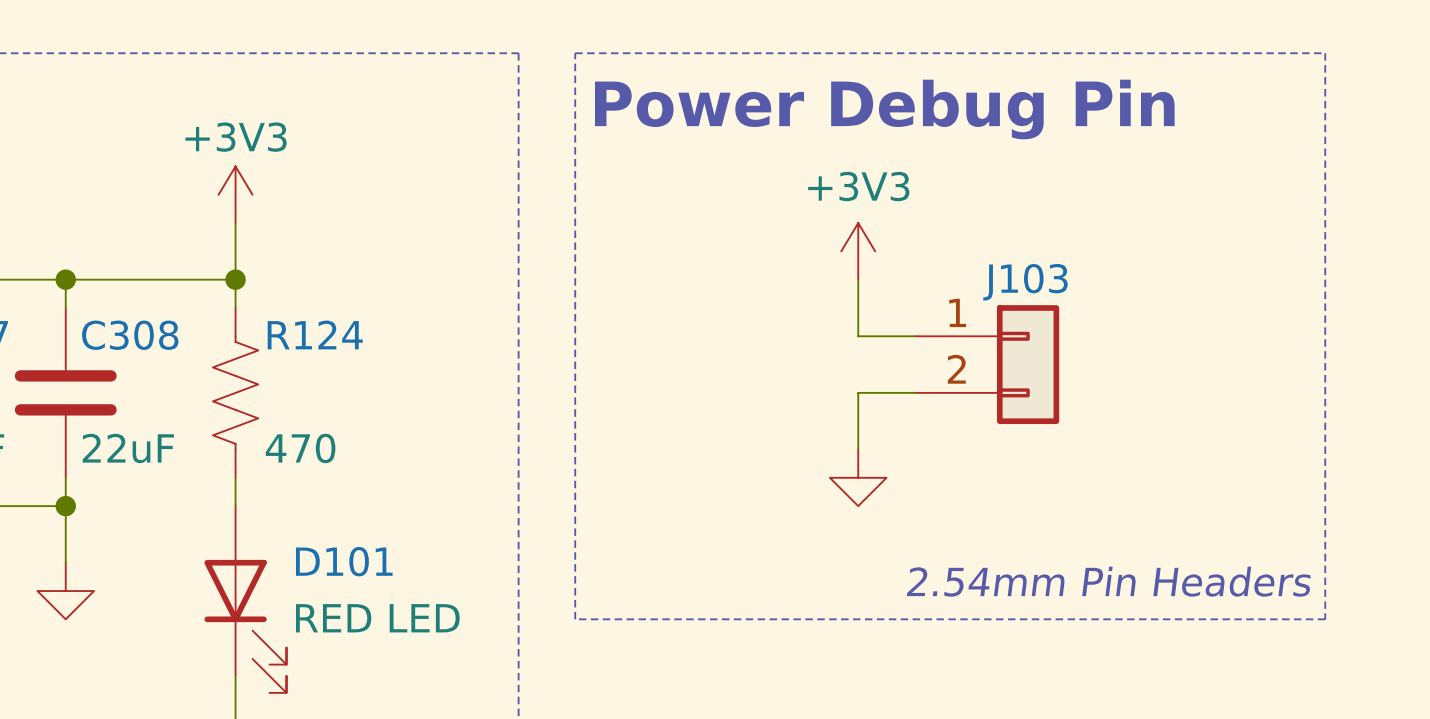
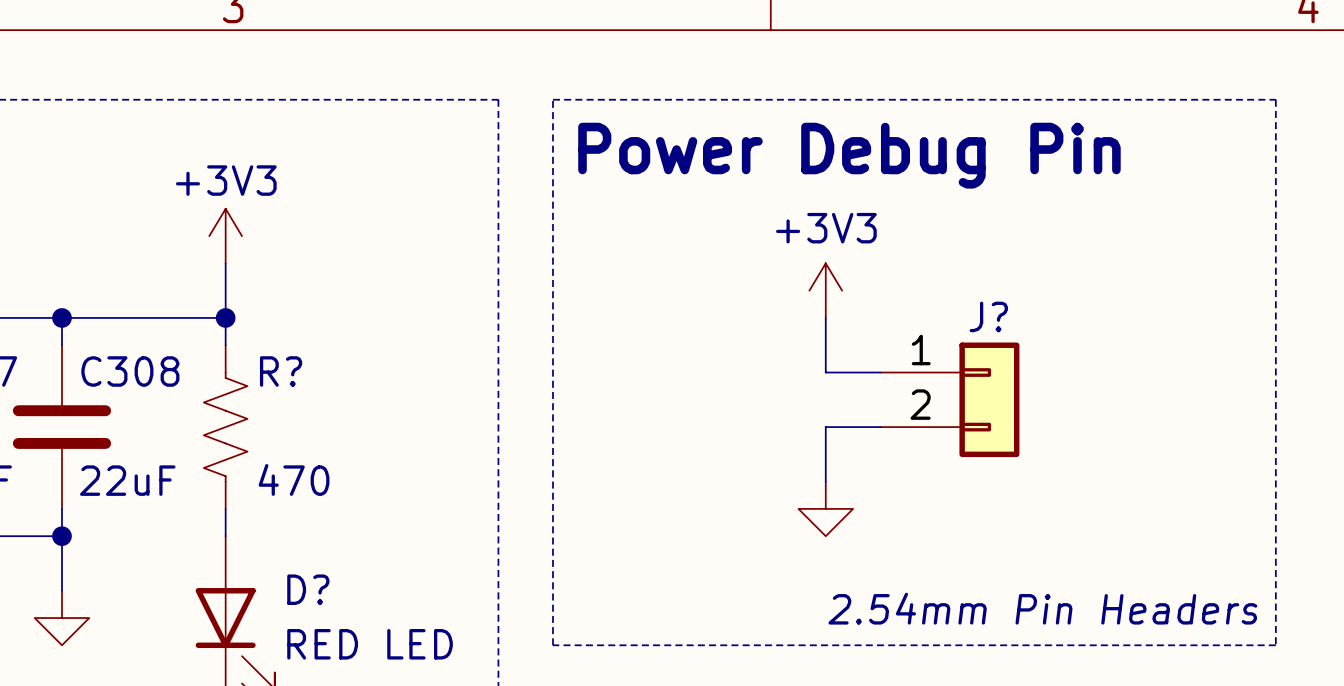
J103 name: J103 (1025, 282) -> J? (988, 316)
R124 name: R124 (315, 334) -> R? (281, 371)
D101 name: D101 (344, 561) -> D? (308, 589)

